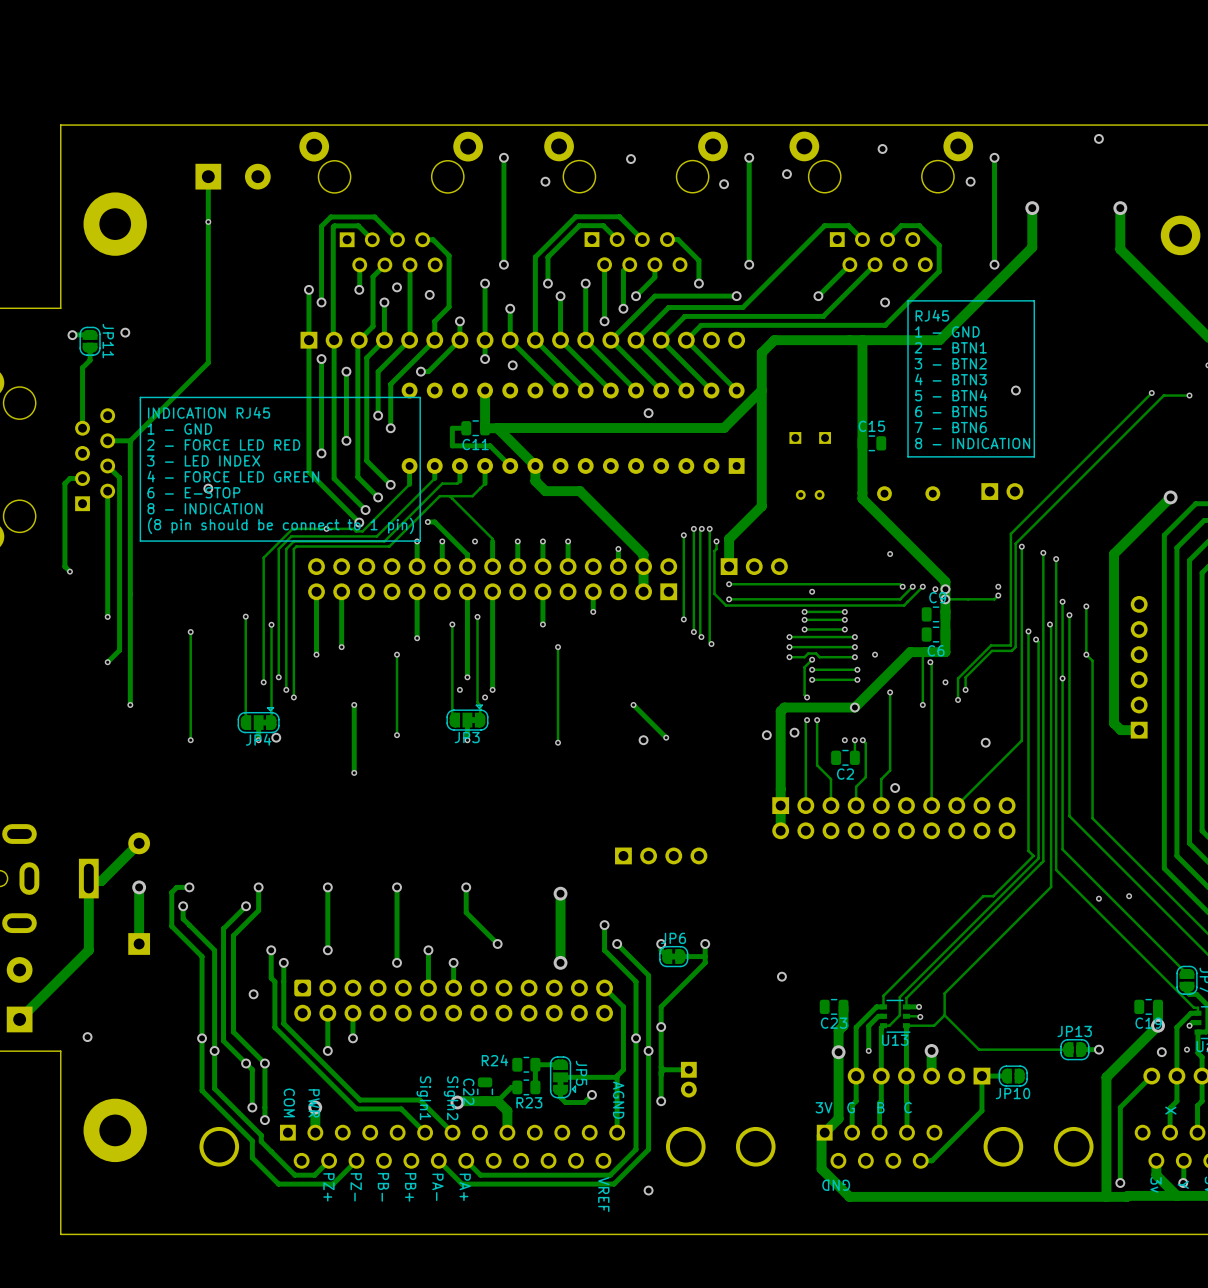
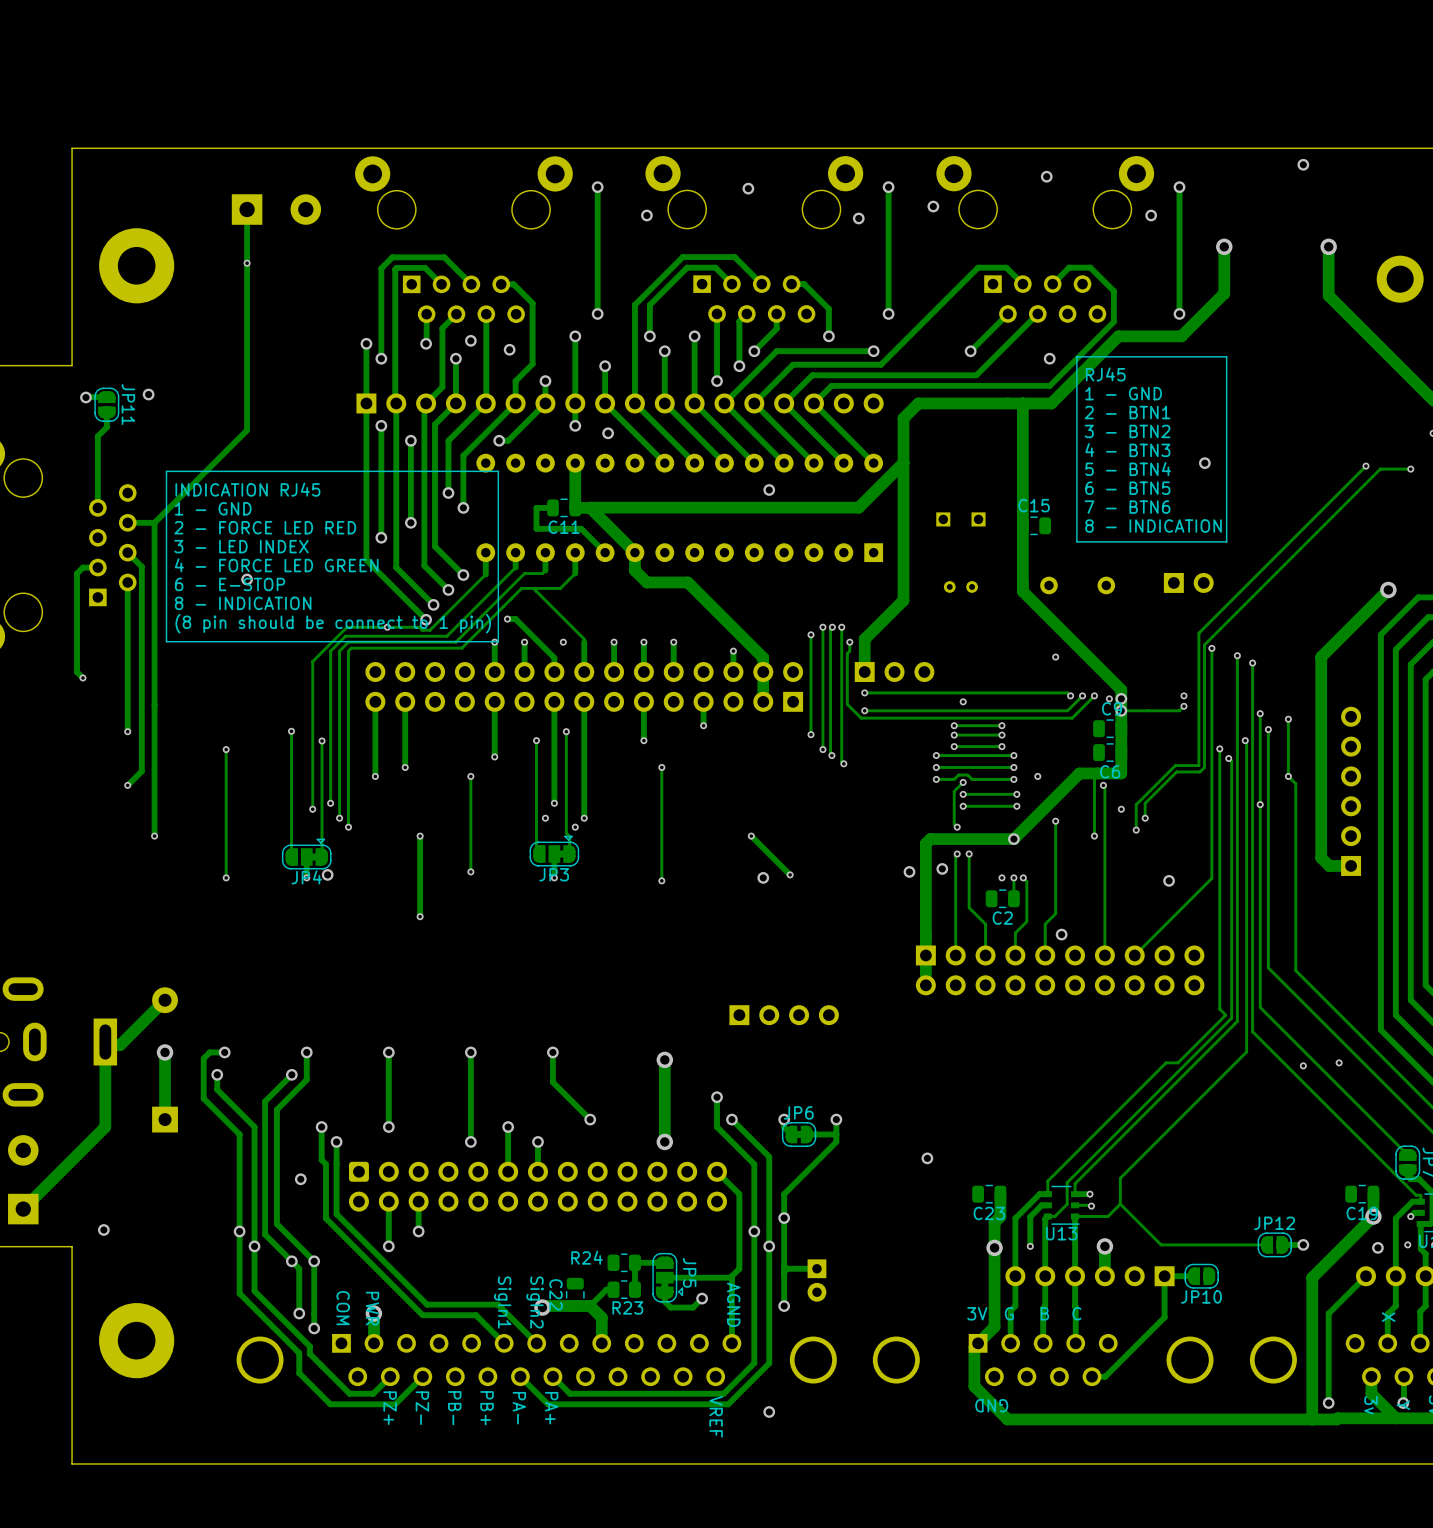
track: (996, 283) (939, 340) (886, 340) -> (1181, 336) (1118, 336) (1051, 403)
JP13 name: JP13 (1074, 1031) -> JP12 (1274, 1223)

